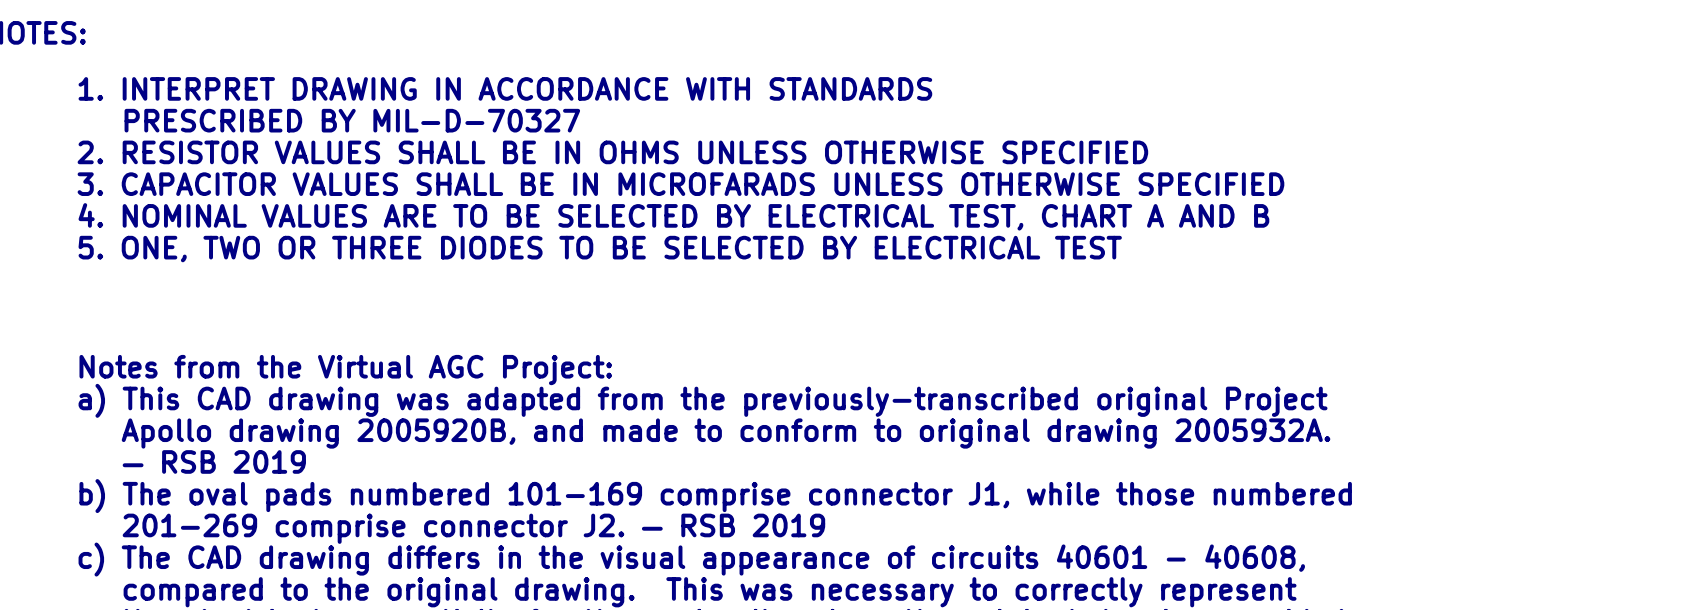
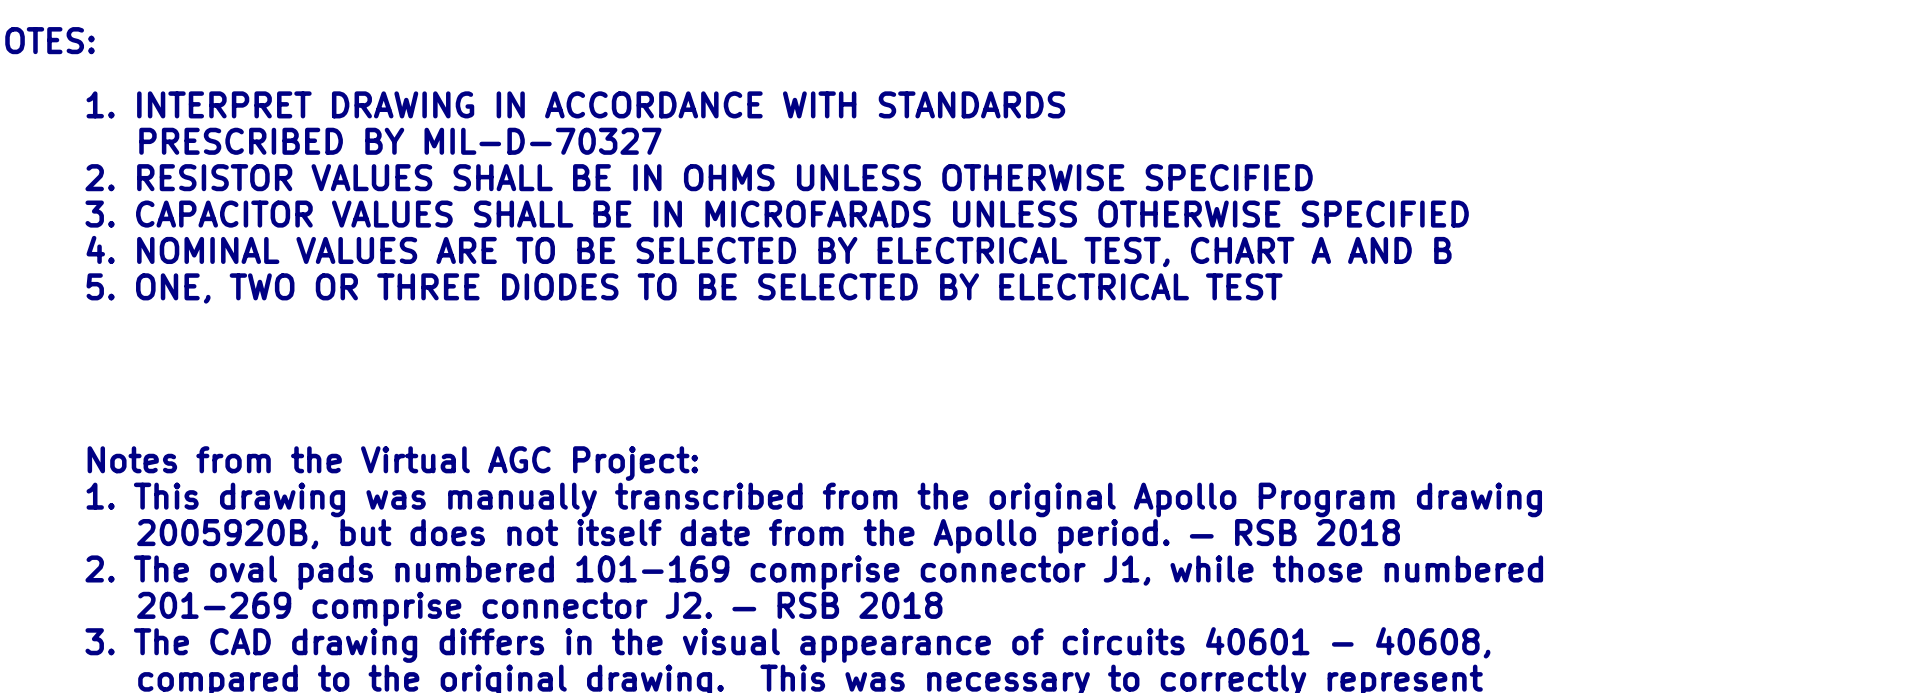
text: Notes from the Virtual AGC Project: (345, 370) -> none
text: a) This CAD drawing was adapted from the previously-transcribed original Project (703, 400) -> Notes from the Virtual AGC Project: (392, 463)
text: Apollo drawing 2005920B, and made to conform to original drawing 2005932A. (726, 433) -> 1. This drawing was manually transcribed from the original Apollo Program drawing (814, 499)
text: — RSB 2019 (214, 461) -> 2005920B, but does not itself date from the Apollo period. — RSB 2018 (768, 536)
text: b) The oval pads numbered 101-169 comprise connector J1, while those numbered (715, 496) -> 2. The oval pads numbered 101-169 comprise connector J1, while those numbered (814, 572)
text: 201-269 comprise connector J2. — RSB 2019 (473, 528) -> 201-269 comprise connector J2. — RSB 2018 (539, 609)
text: c) The CAD drawing differs in the visual appearance of circuits 40601 - 40608, (691, 559) -> 3. The CAD drawing differs in the visual appearance of circuits 40601 - 40608, (787, 644)

